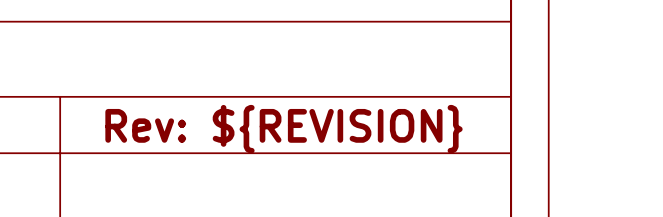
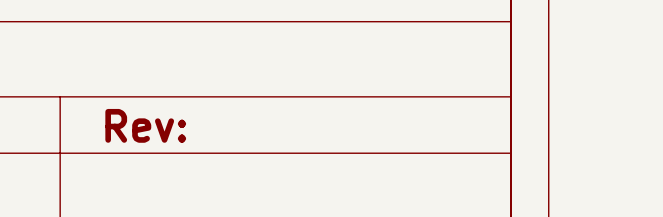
title block: Rev: ${REVISION} (283, 129) -> Rev: (145, 125)

